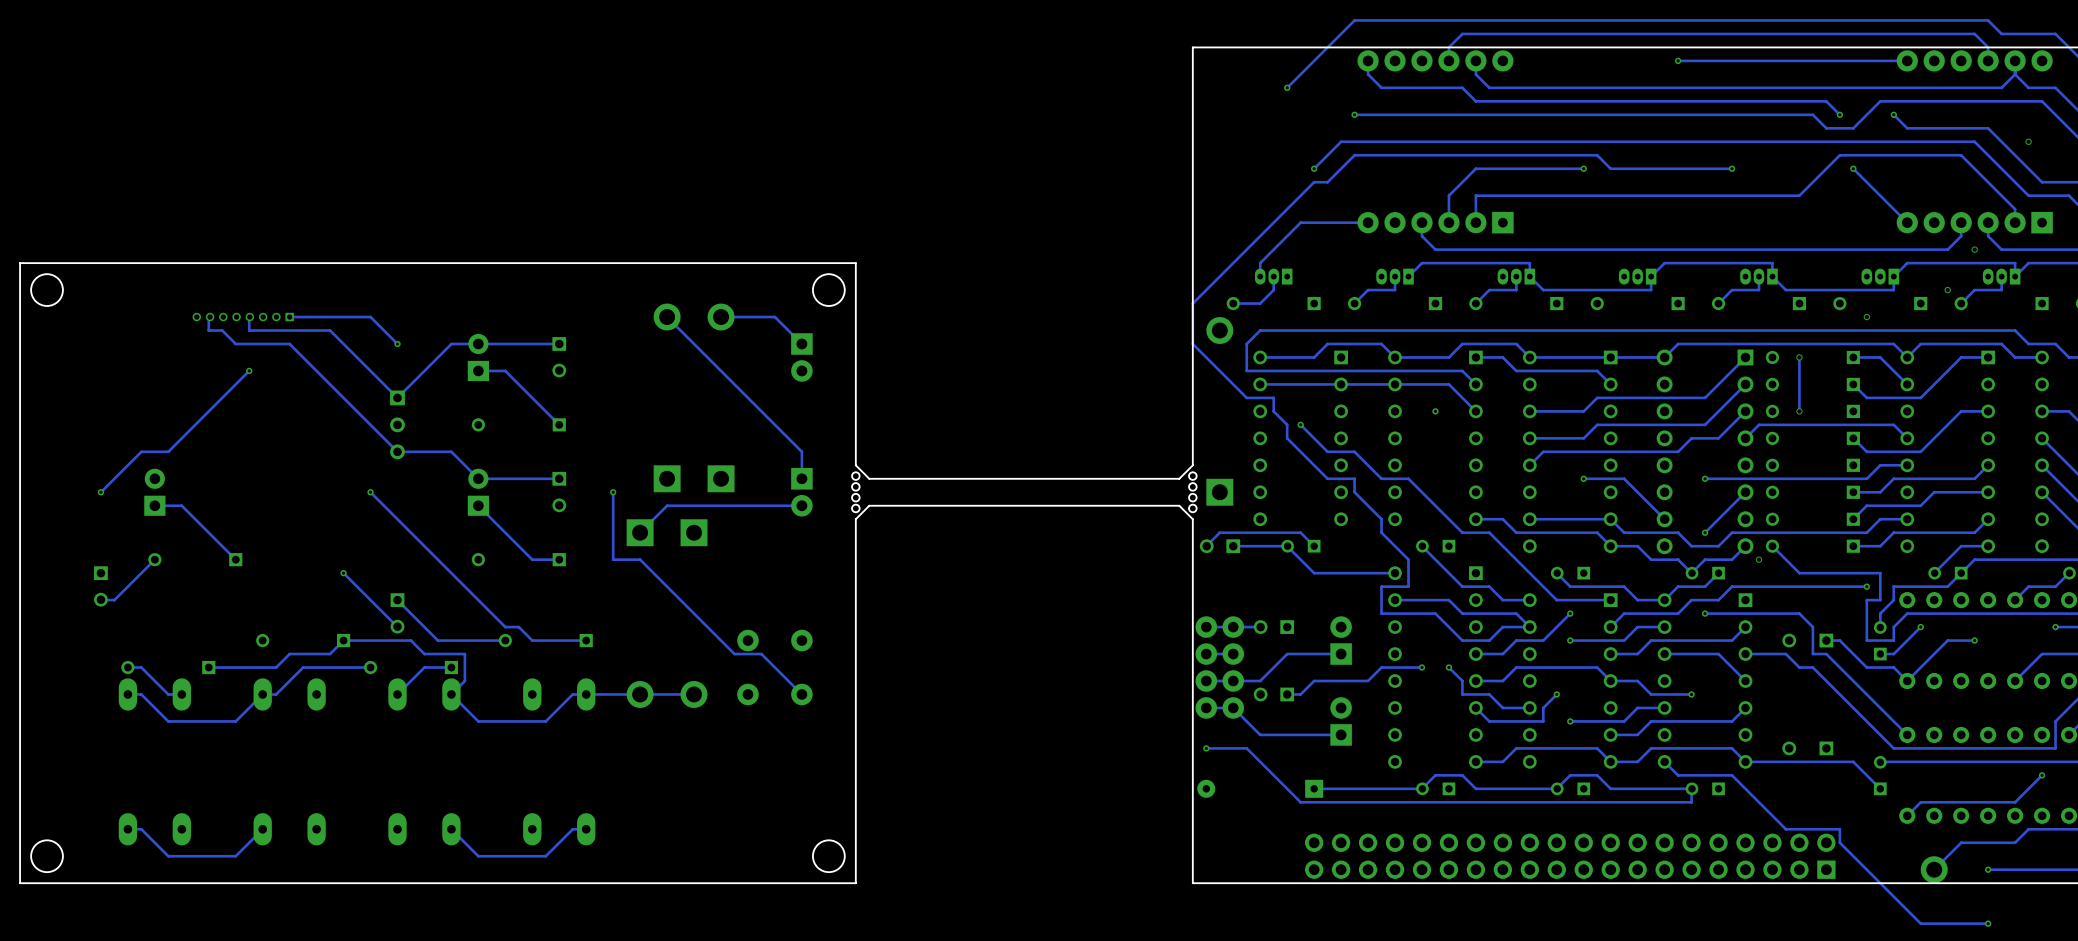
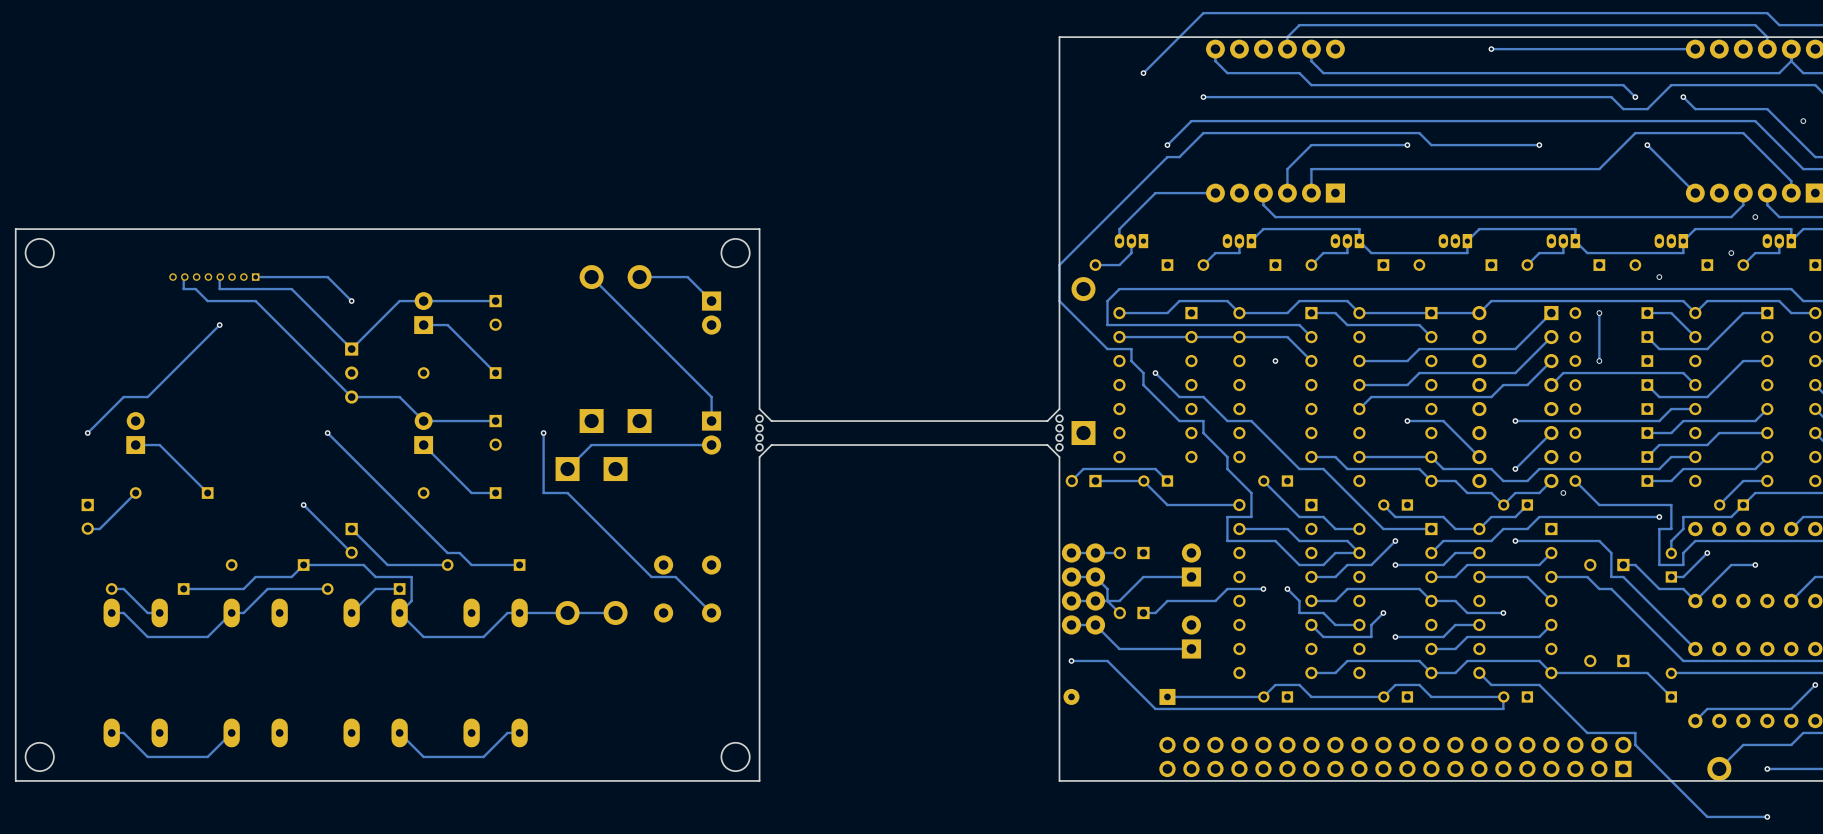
track: none -> (1095, 576) (1107, 588) (1107, 600) (1119, 612)

